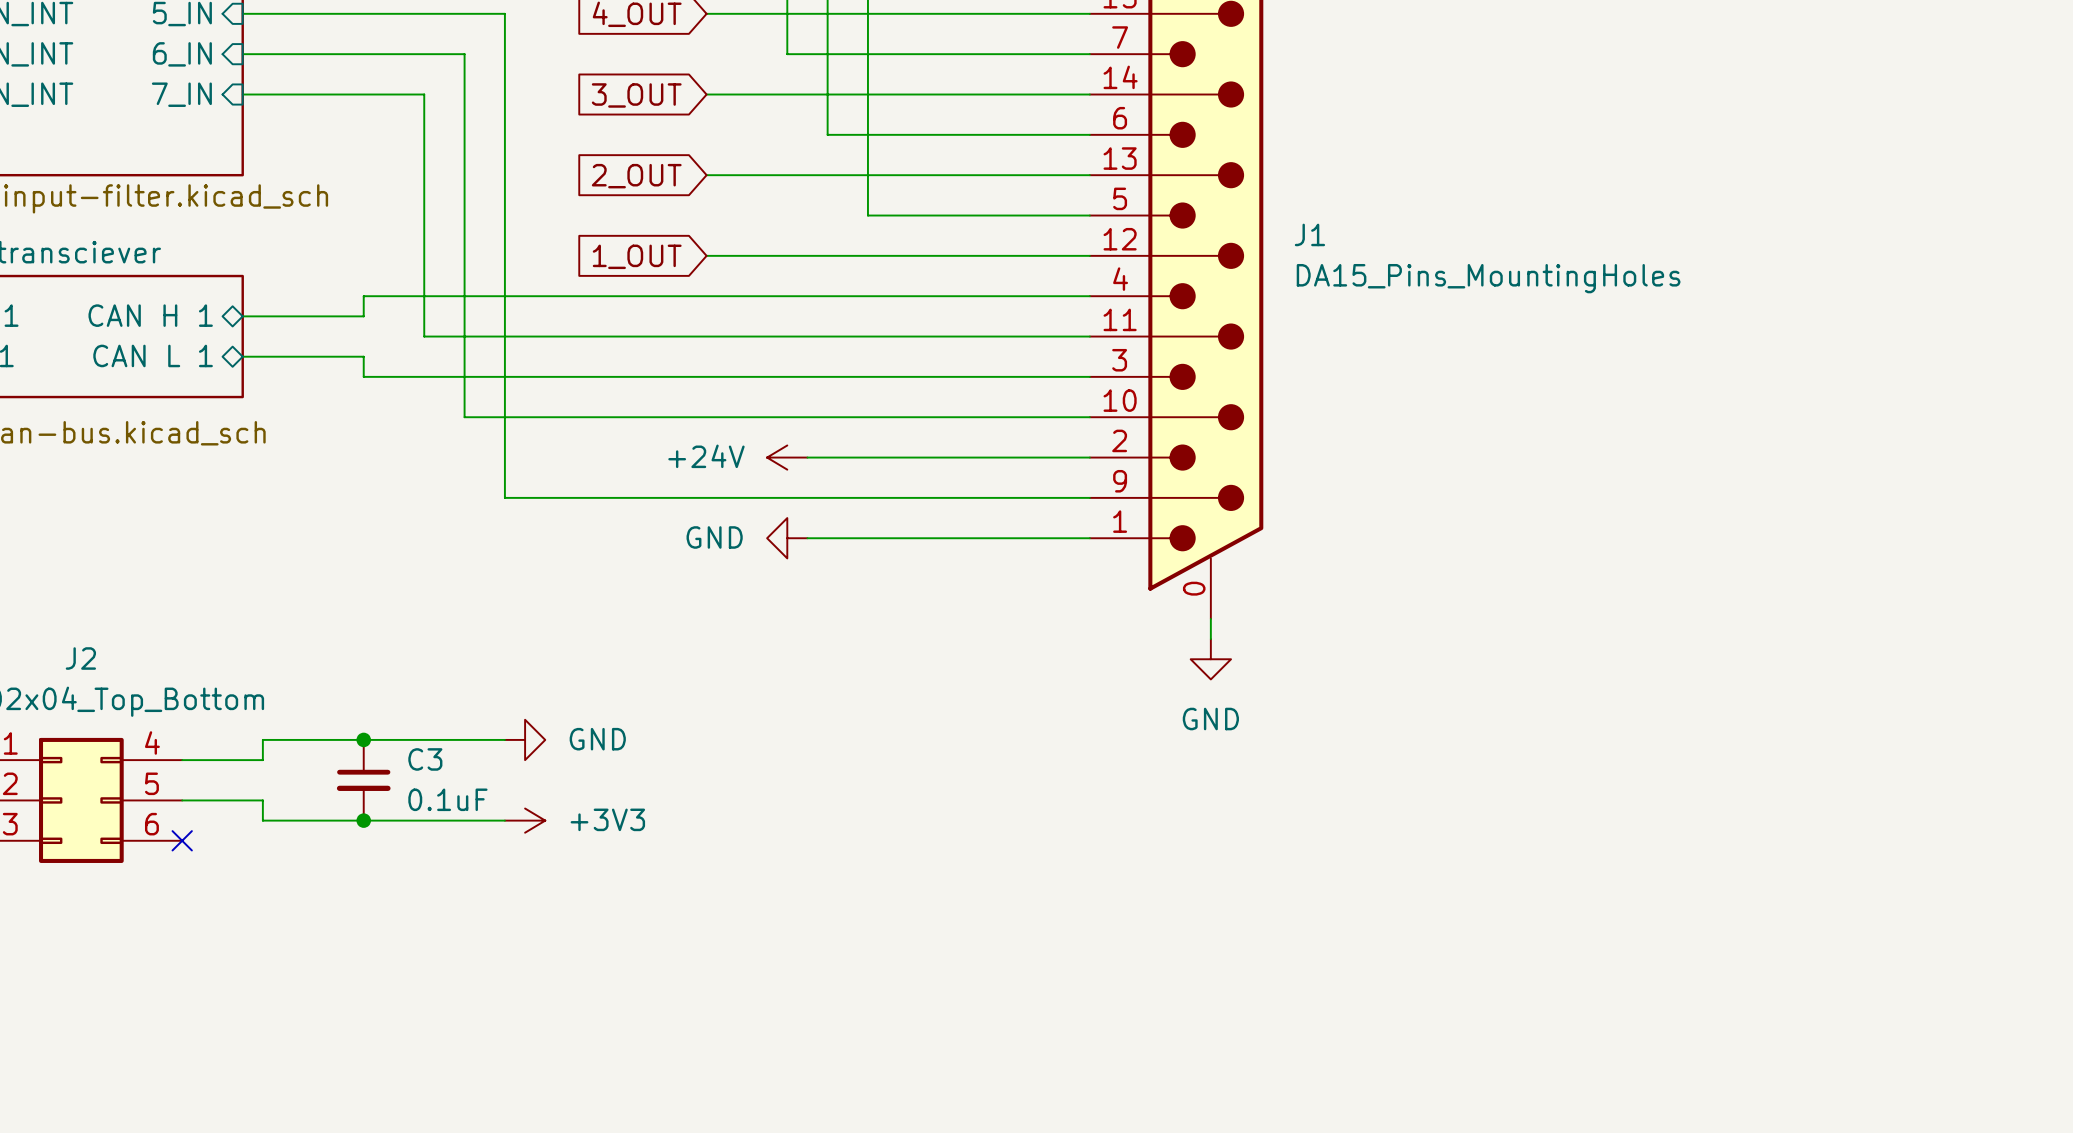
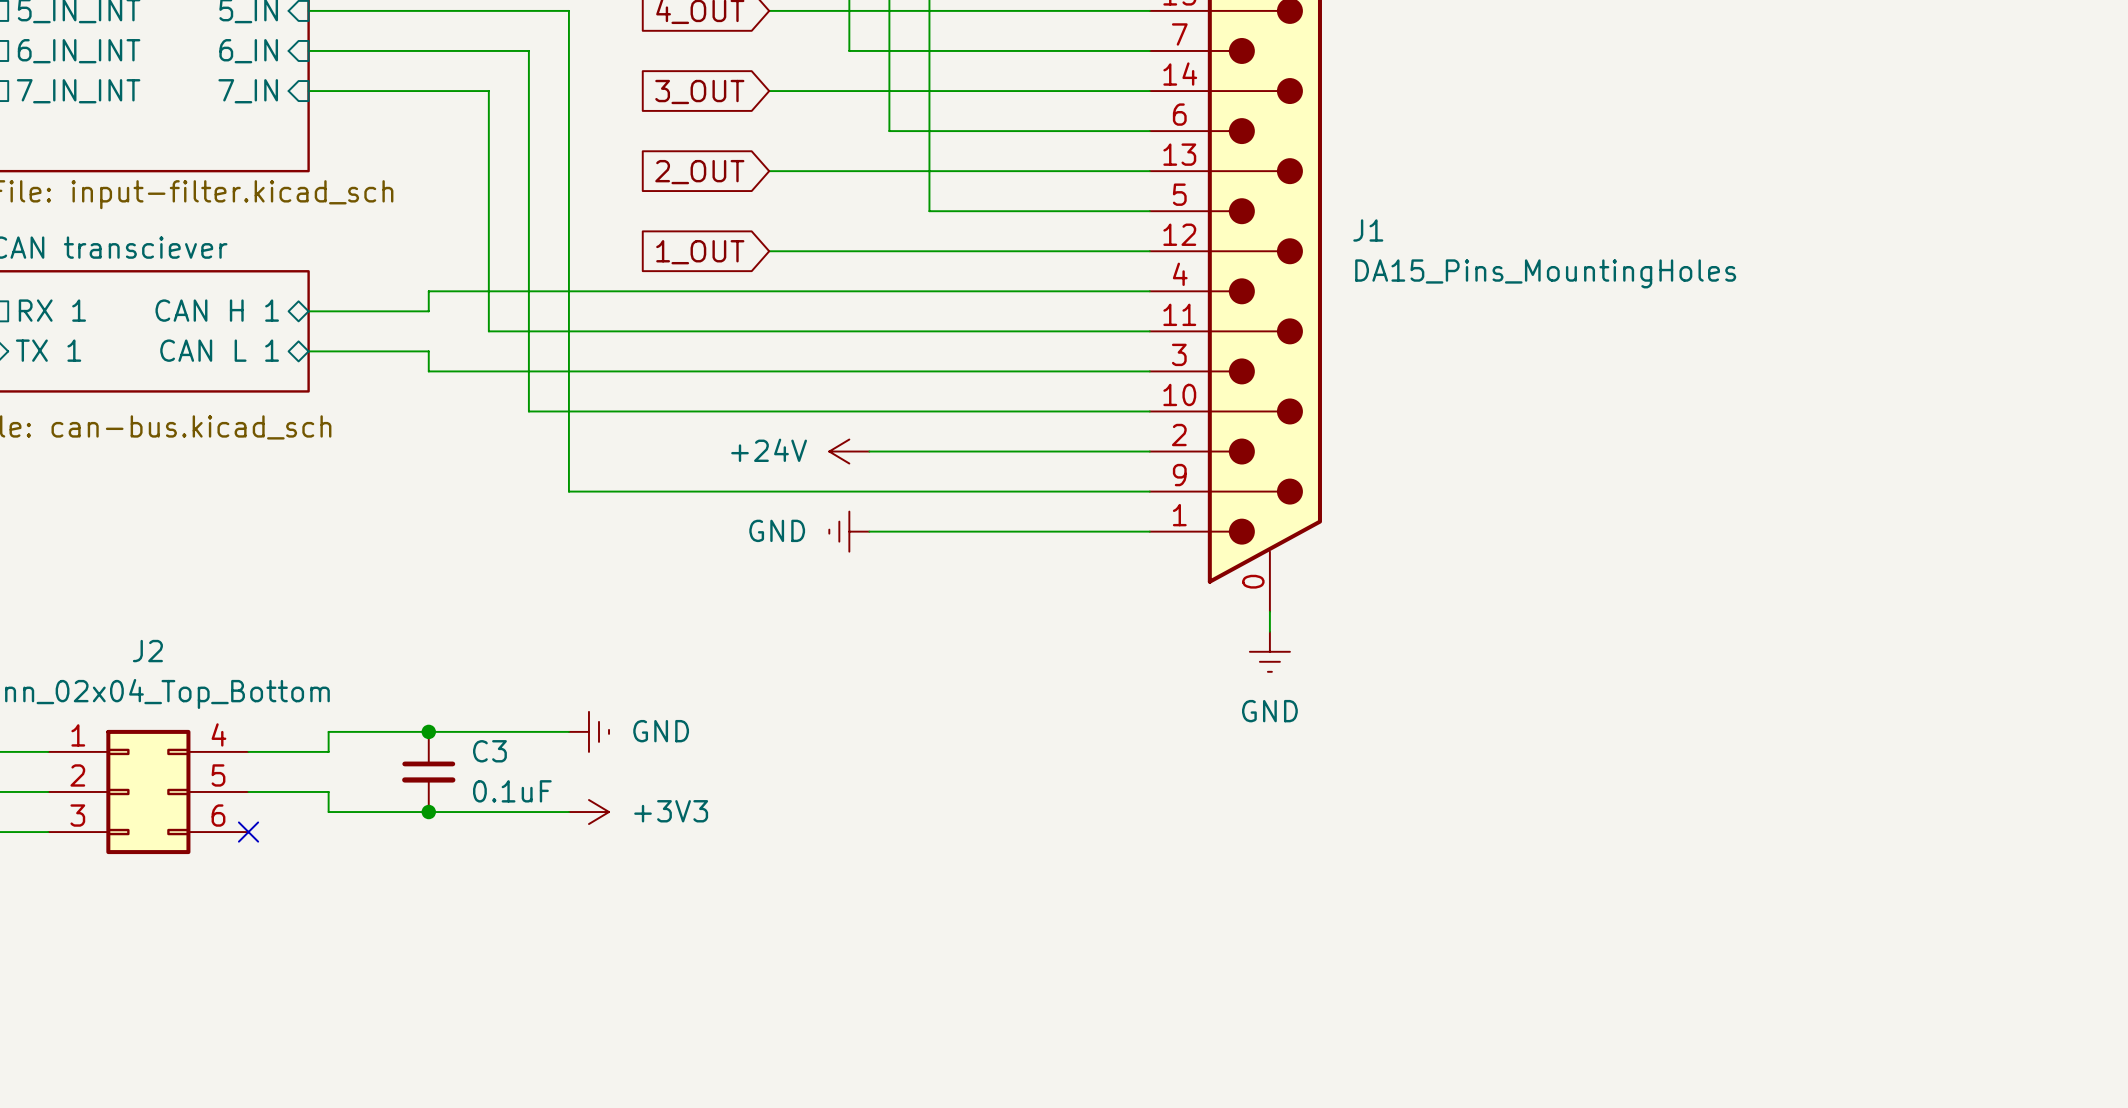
power symbol shape: [767, 518, 808, 559] -> [829, 511, 870, 552]
power symbol shape: [1190, 639, 1232, 680] -> [1249, 631, 1290, 672]
power symbol shape: [504, 719, 546, 761] -> [568, 711, 610, 752]

